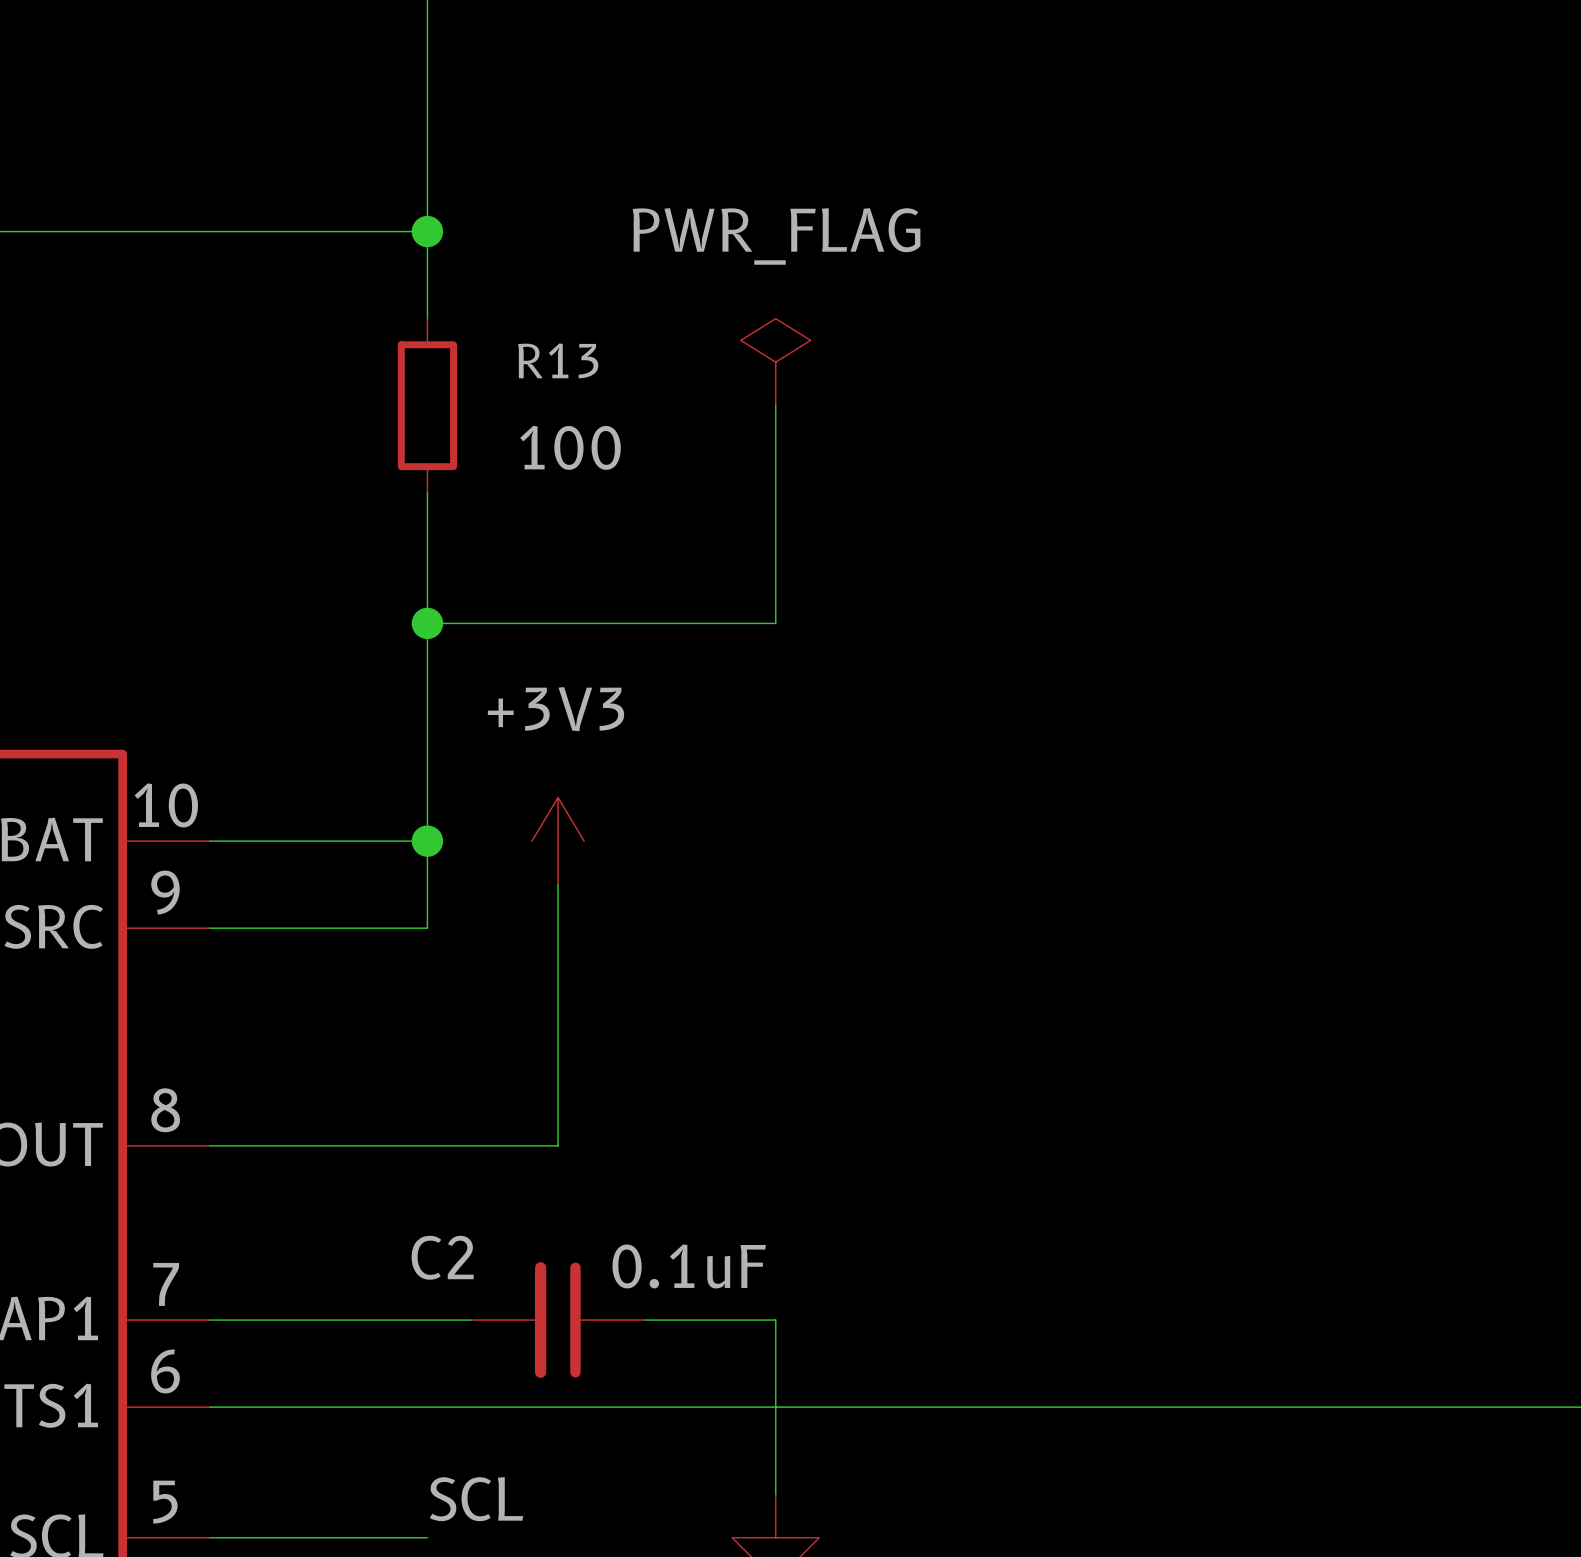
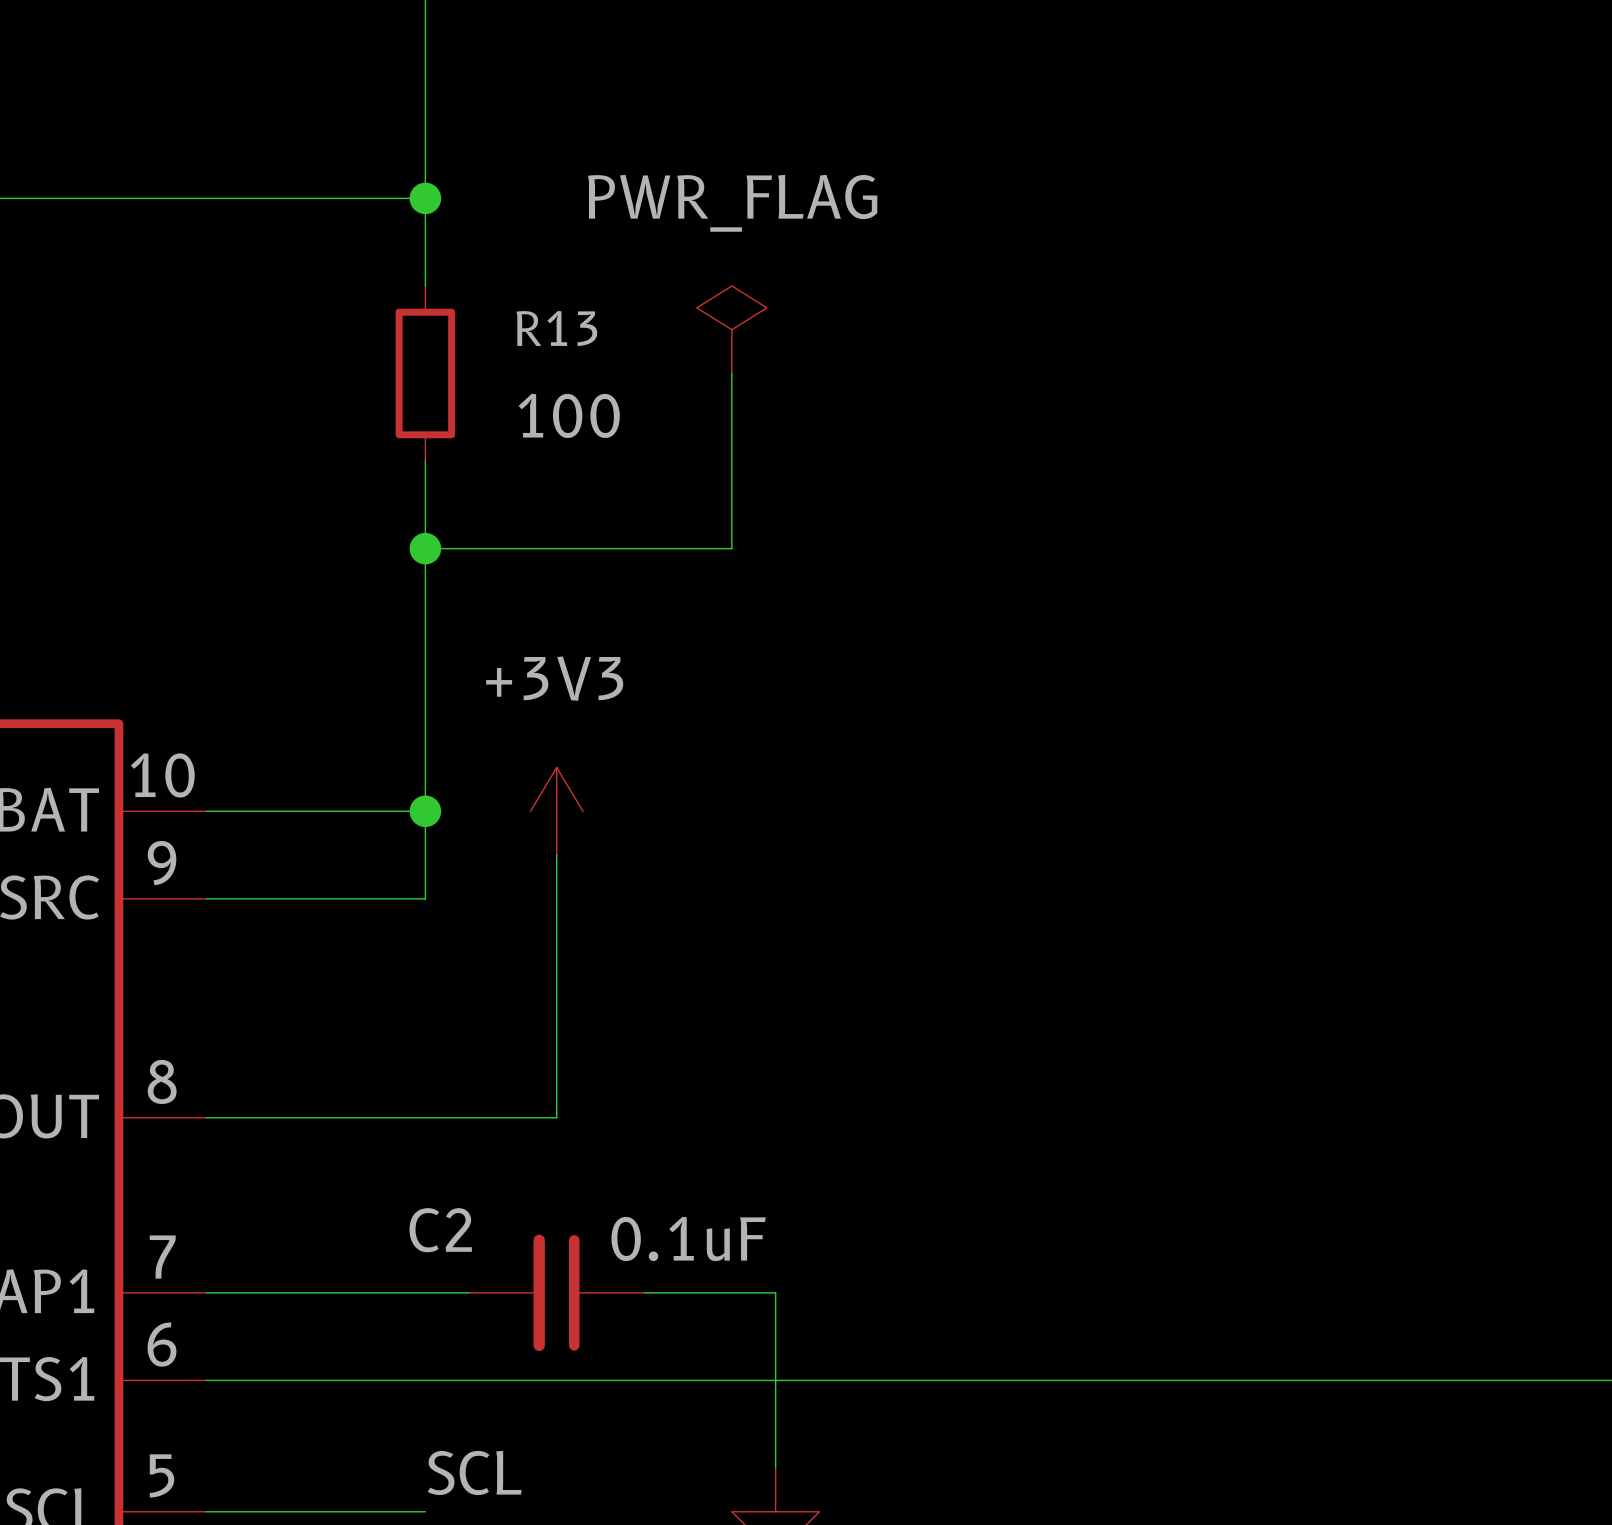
power symbol position: PWR_FLAG (775, 362) -> PWR_FLAG (731, 329)
wire: none -> (731, 373) (731, 548) (425, 548)
wire: (775, 405) (775, 623) (427, 623) -> none
junction position: (427, 623) -> (425, 548)

